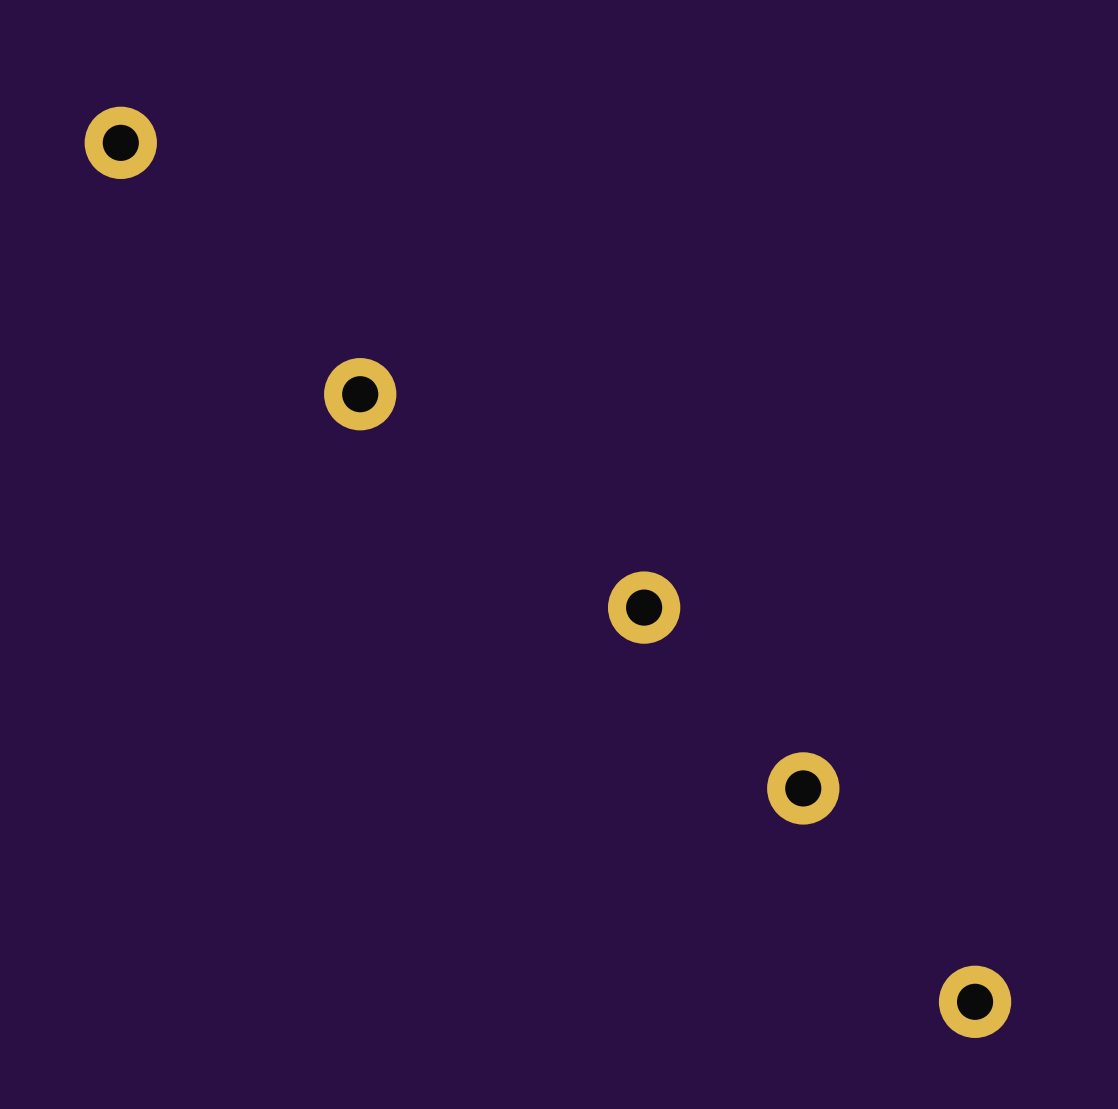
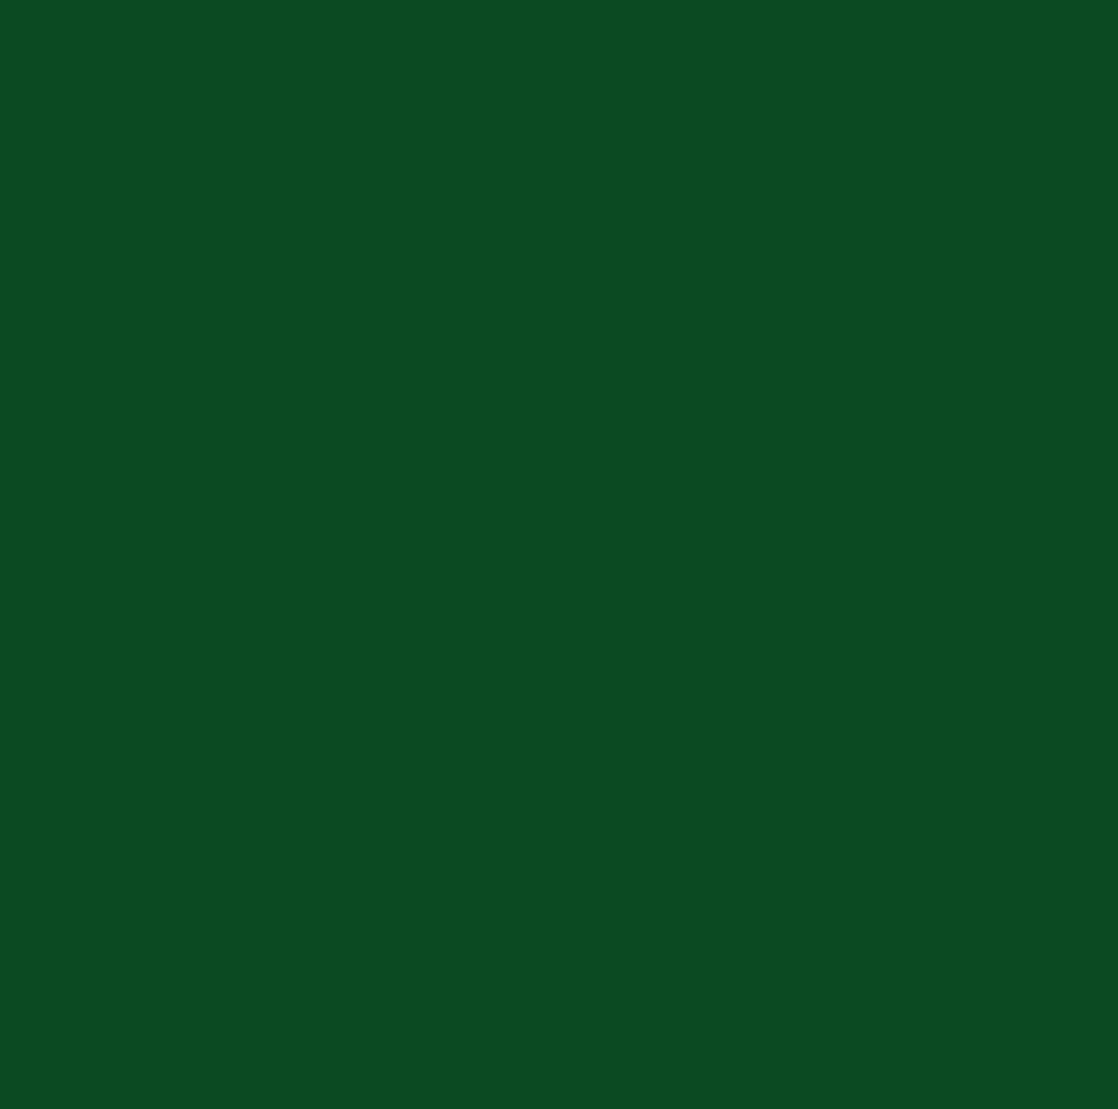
part: (120, 142) -> none
part: (360, 394) -> none
part: (644, 607) -> none
part: (803, 788) -> none
part: (975, 1001) -> none

